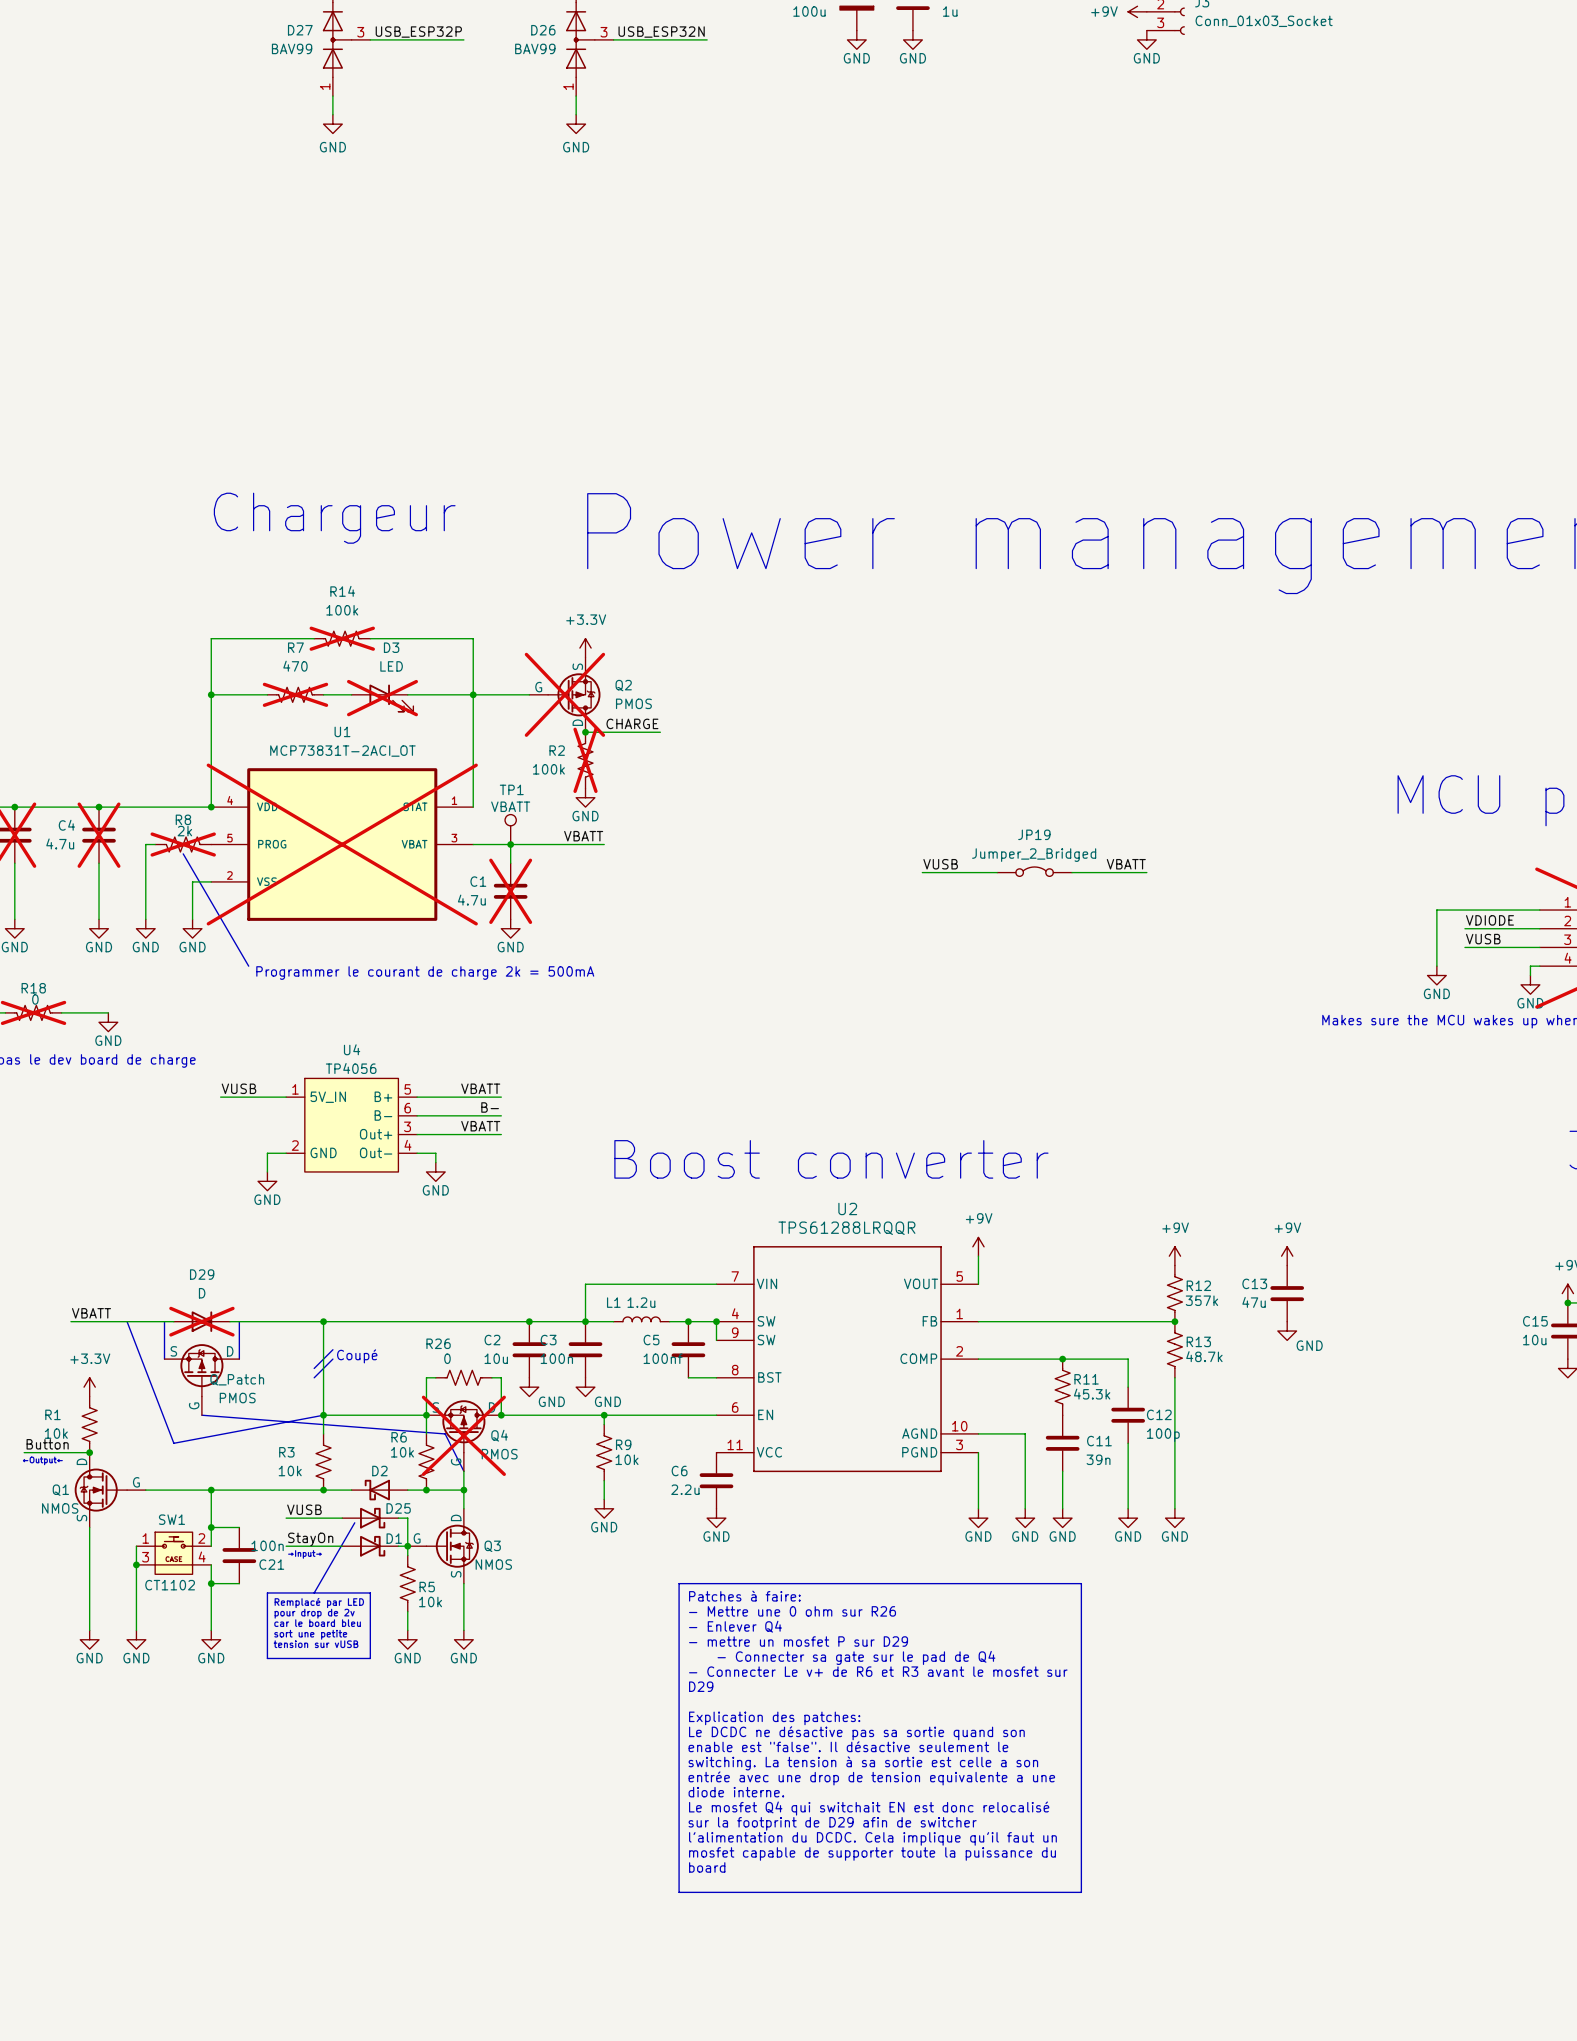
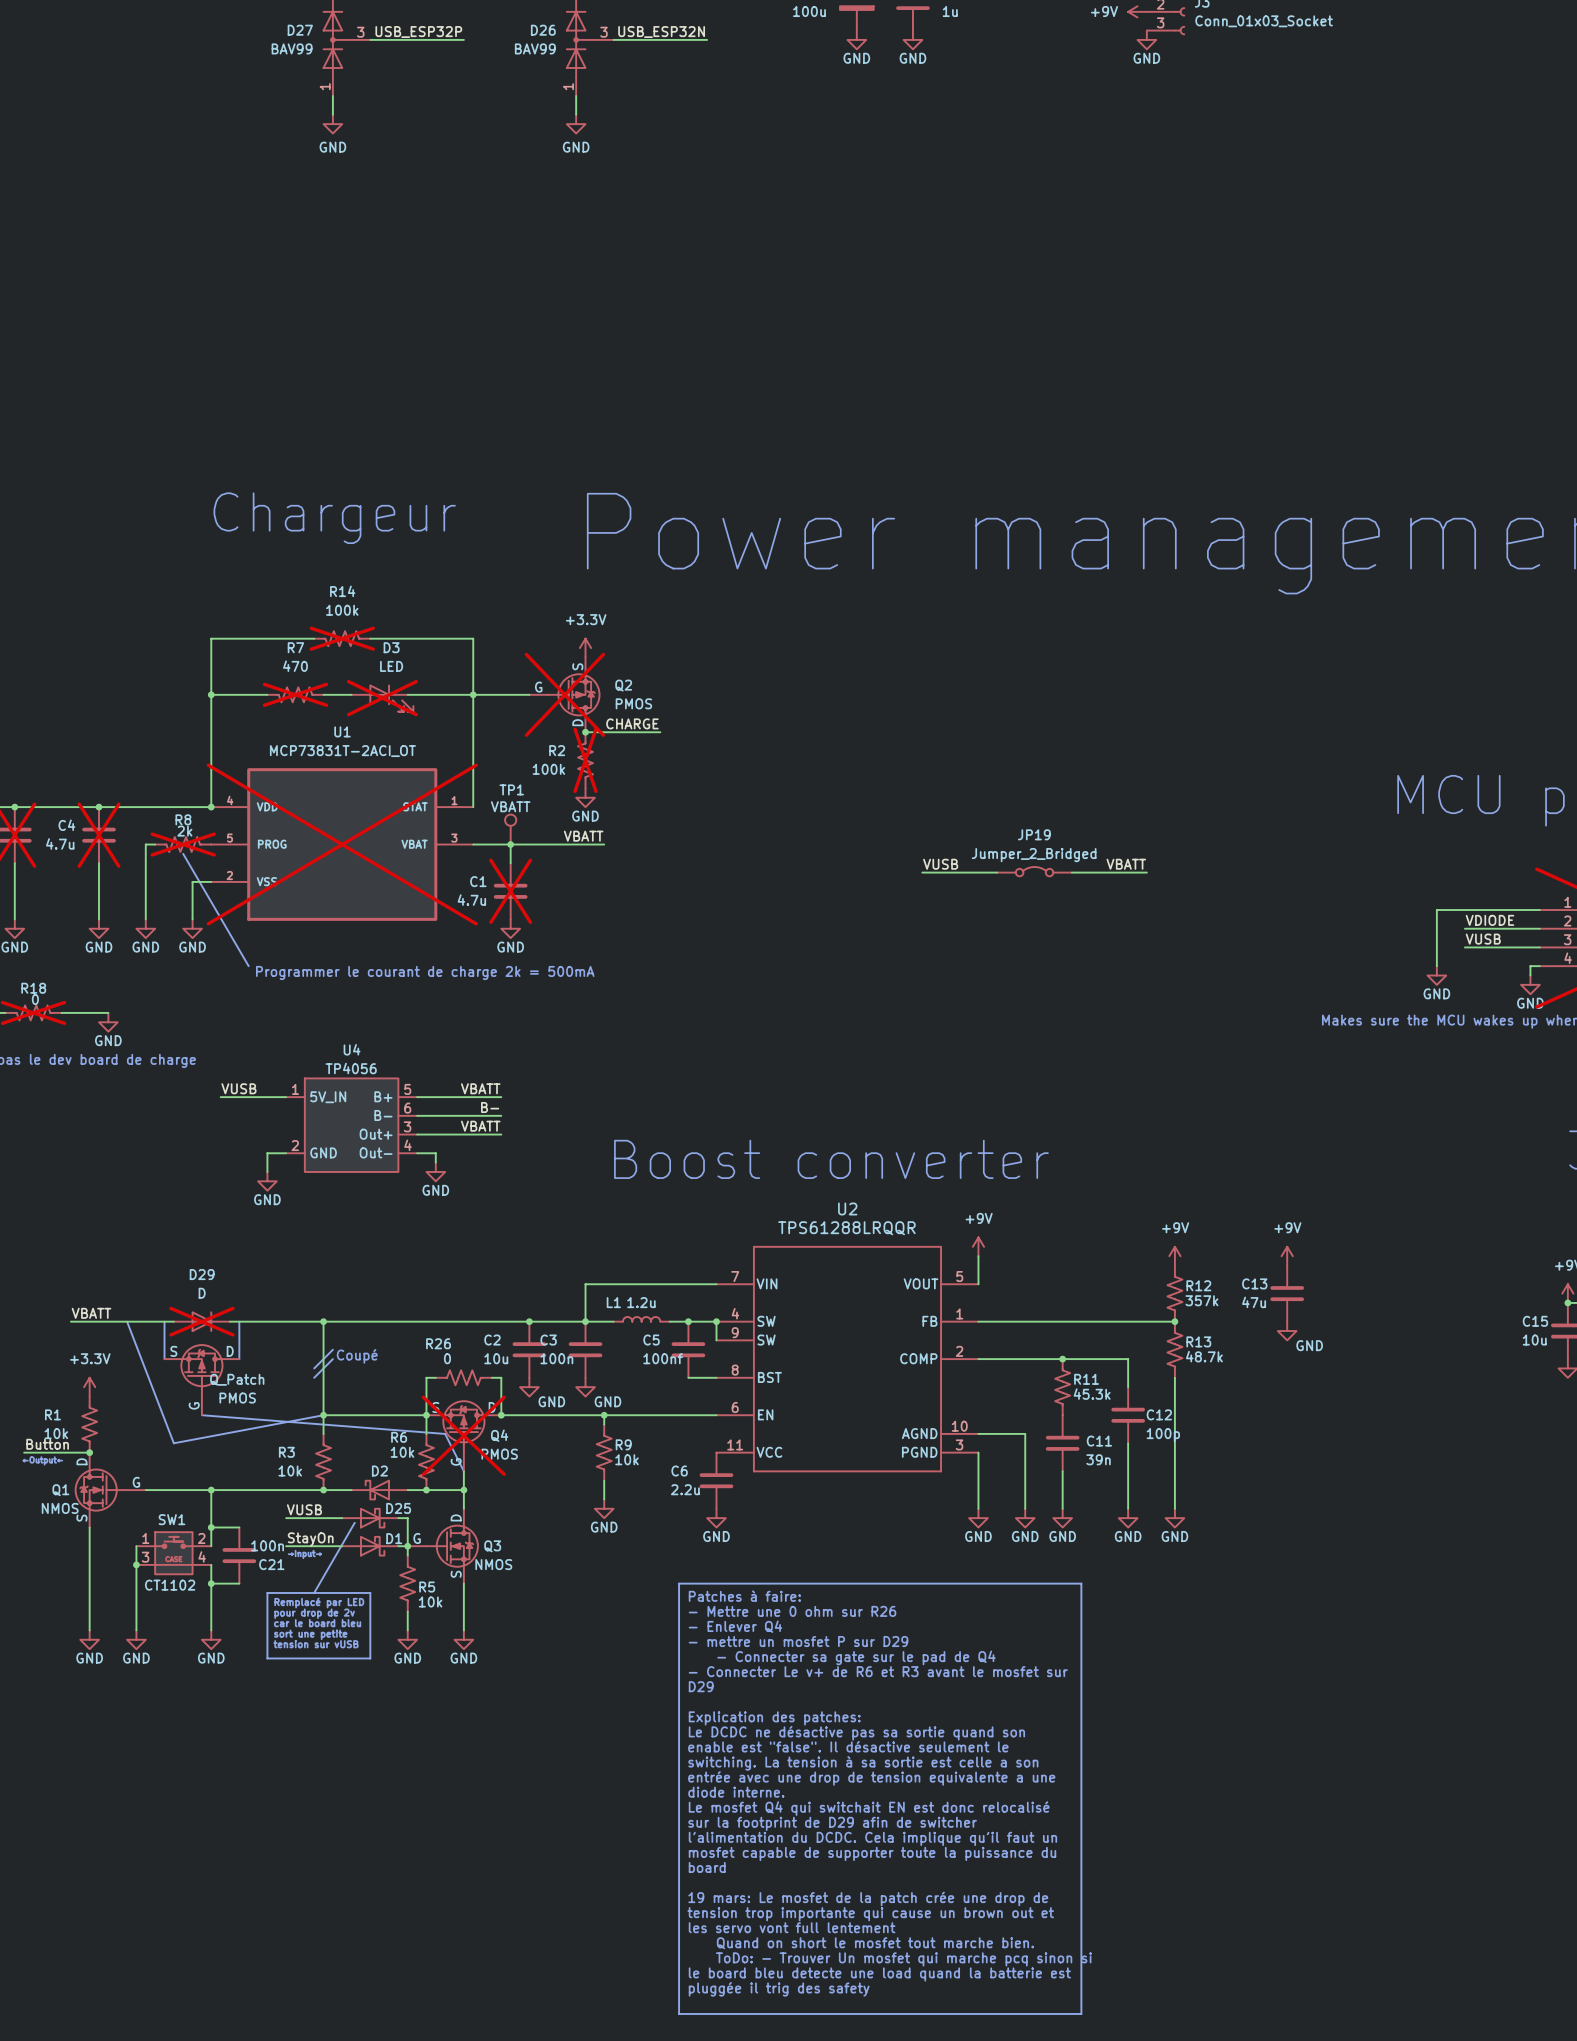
line: (679, 1892) (1081, 1892) -> (679, 1892) (679, 2013) (1081, 2013) (1081, 1892)
text: none -> 19 mars: Le mosfet de la patch crée une drop de (868, 1898)
text: none -> tension trop importante qui cause un brown out et (870, 1914)
text: none -> les servo vont full lentement (792, 1927)
text: none -> Quand on short le mosfet tout marche bien. (875, 1943)
text: none -> ToDo: - Trouver Un mosfet qui marche pcq sinon si (903, 1959)
text: none -> le board bleu detecte une load quand la batterie est (879, 1974)
text: none -> pluggée il trig des safety (779, 1989)

